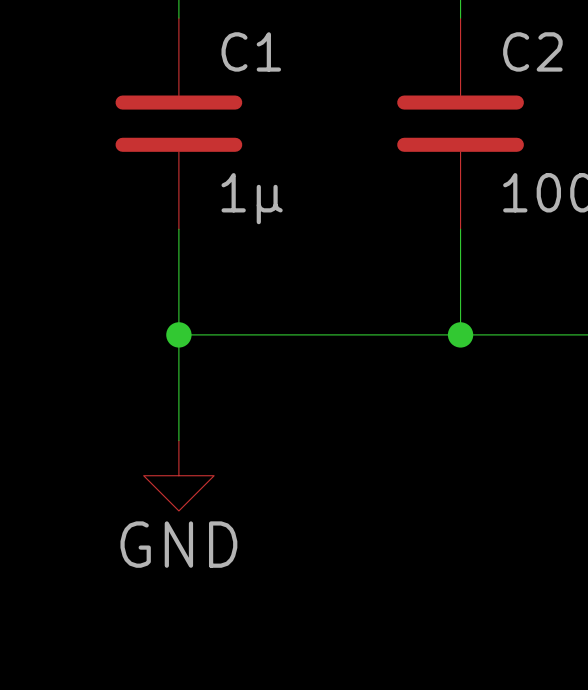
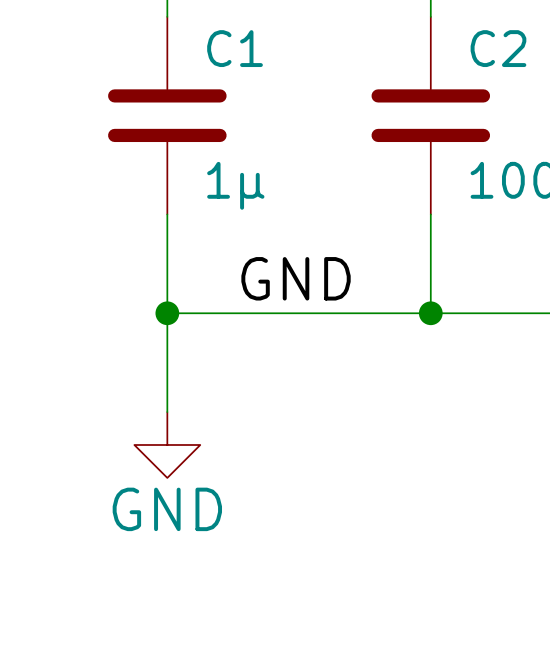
label: none -> GND (296, 278)

